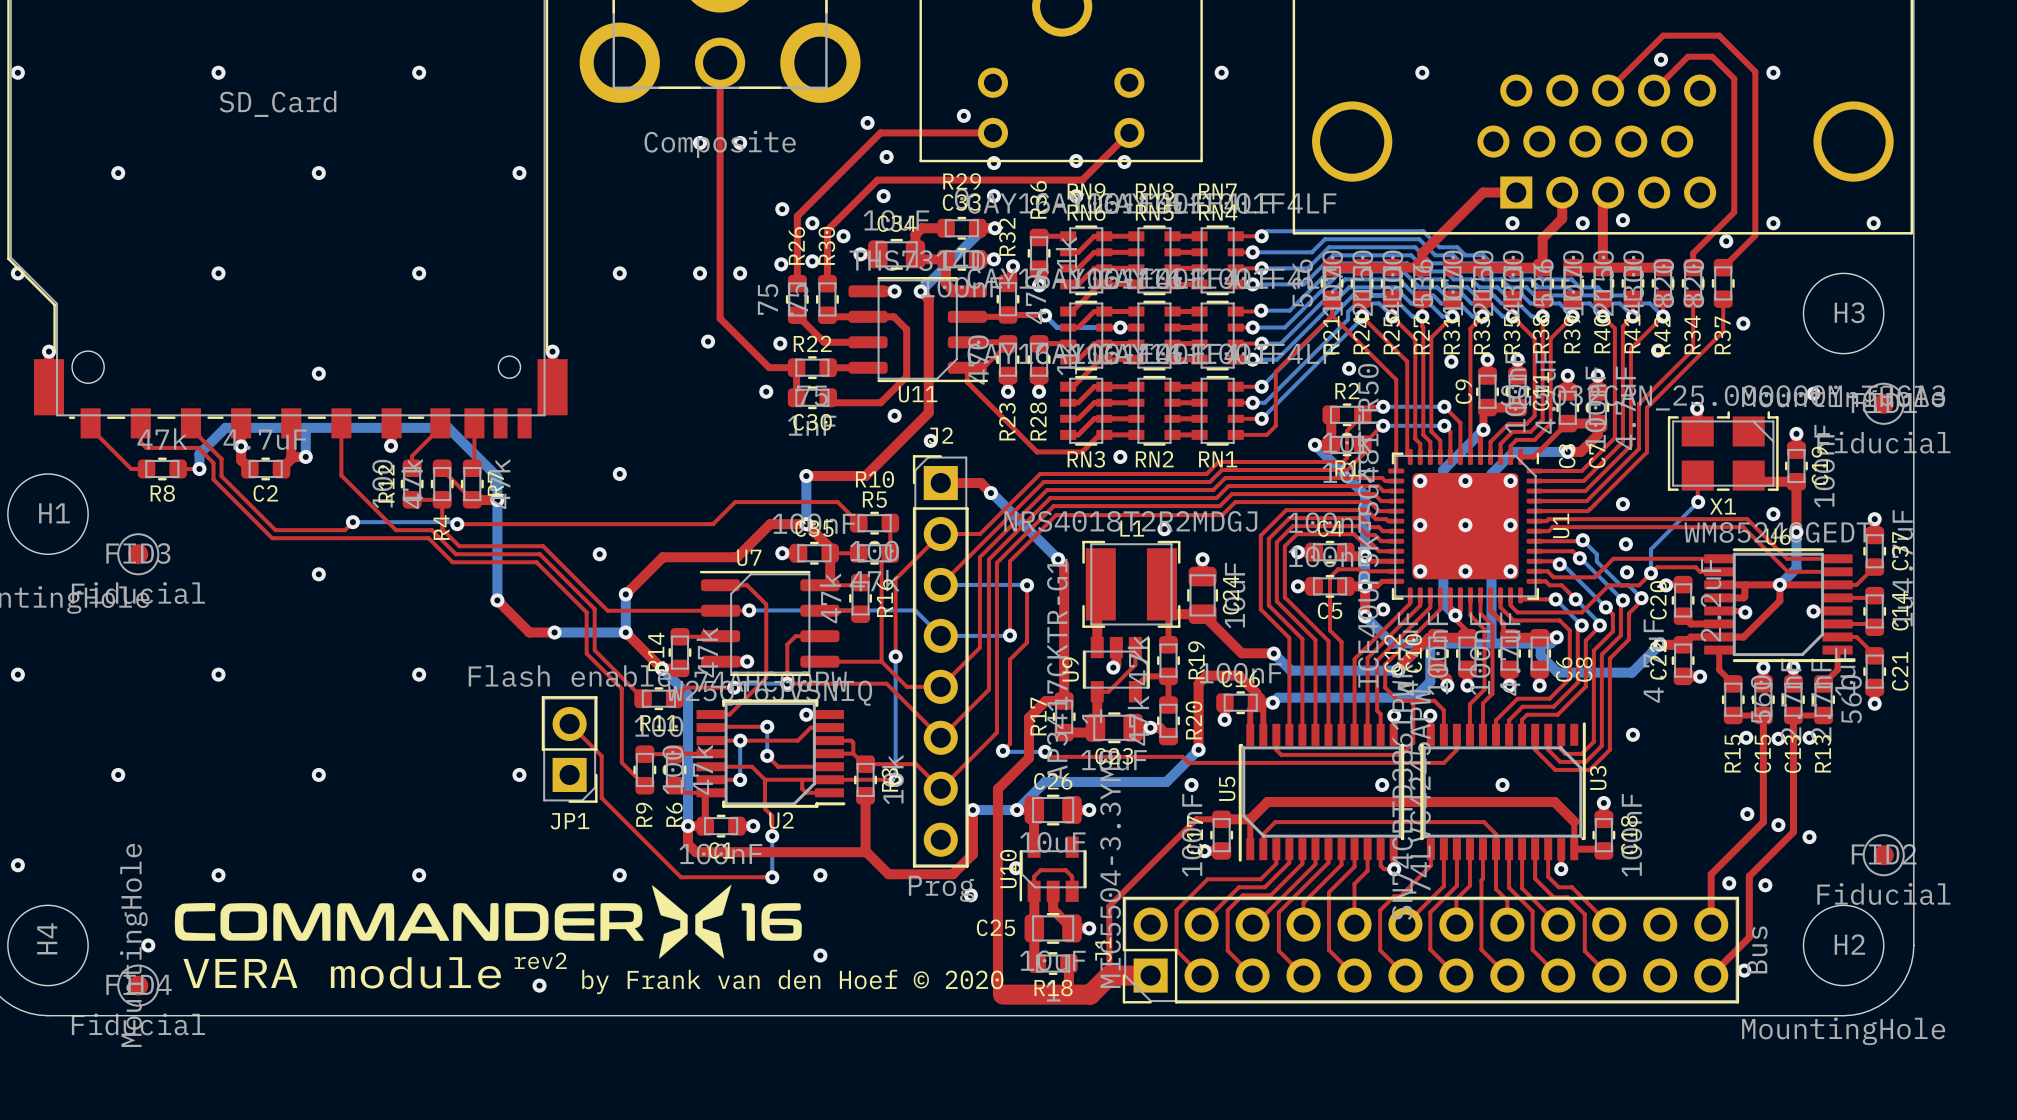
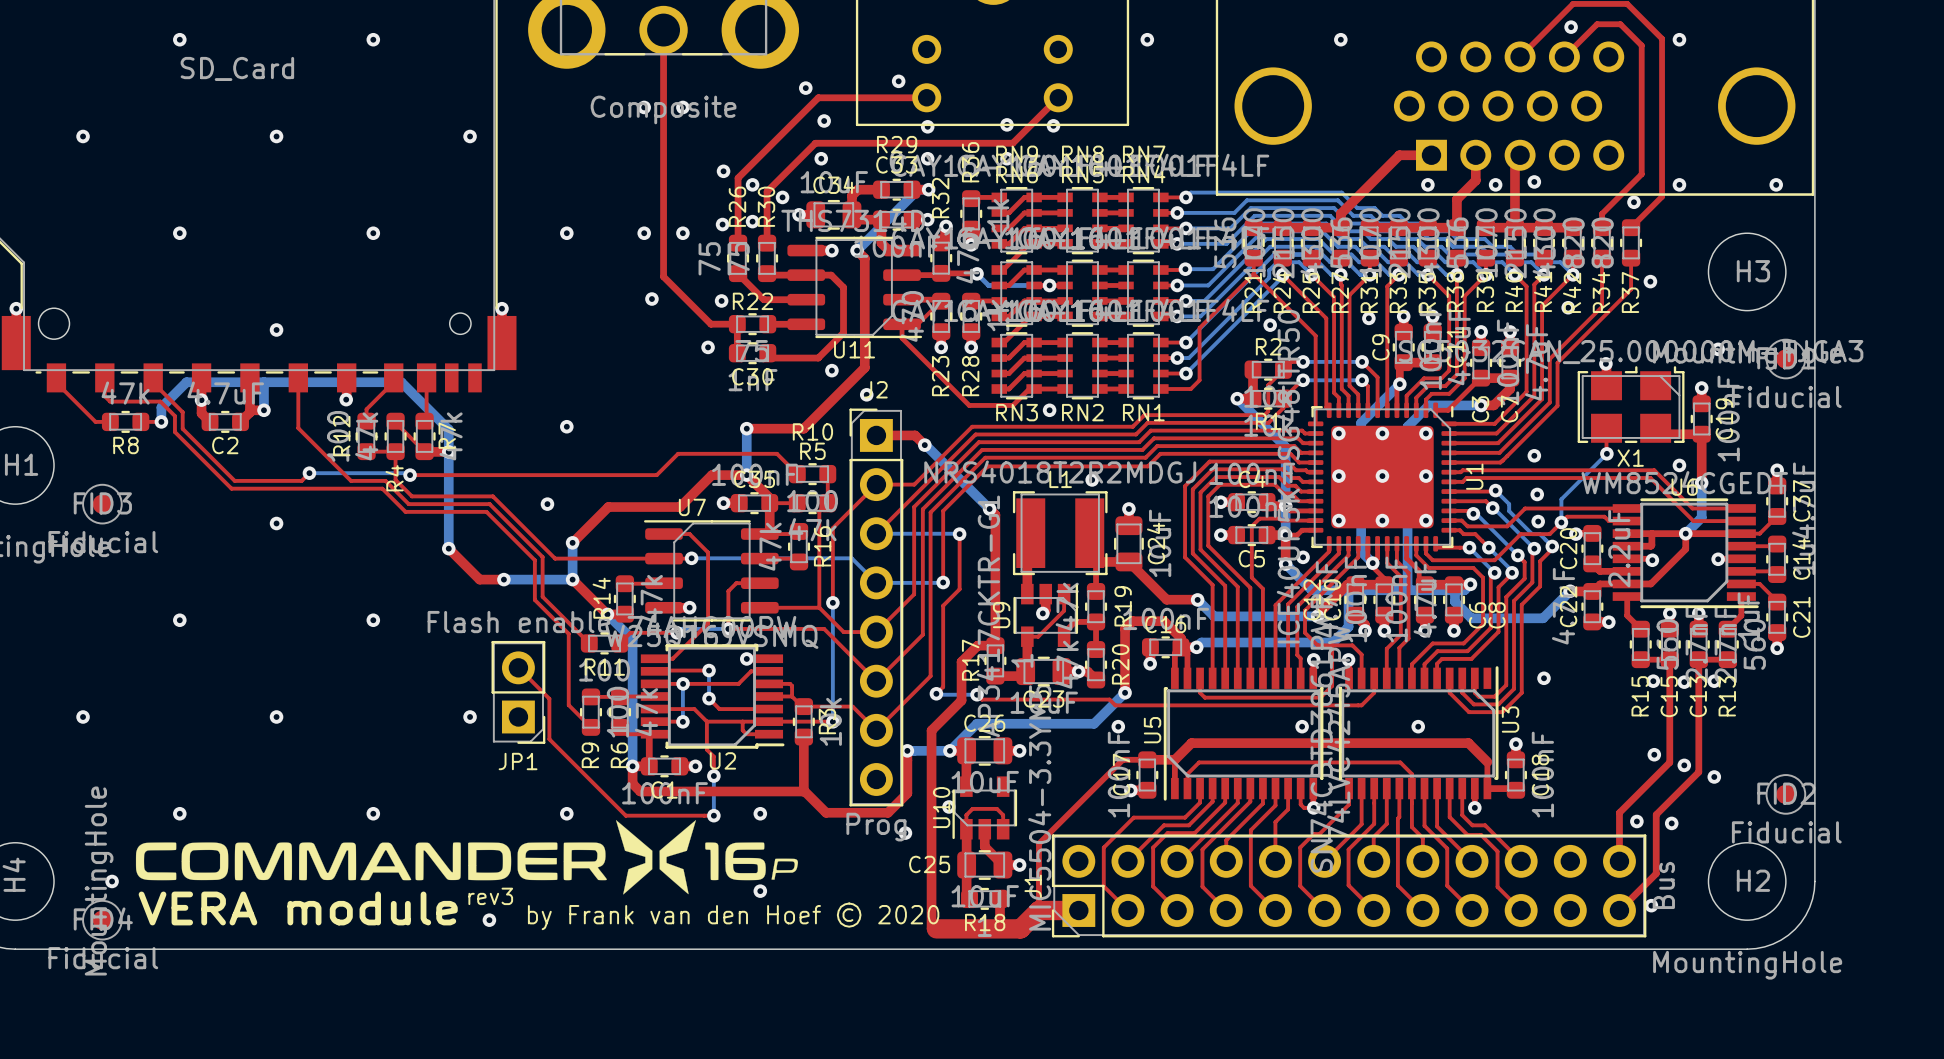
drawing: none -> [135, 820, 798, 895]
drawing: [174, 884, 802, 959] -> none
text: rev2 (540, 960) -> rev3 (490, 896)

